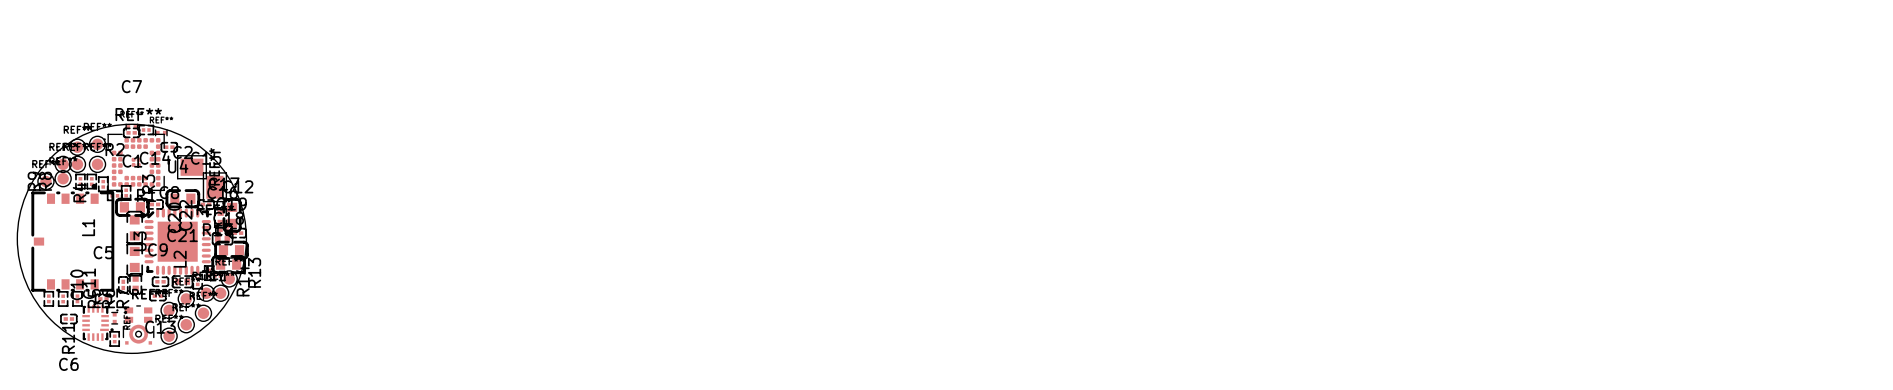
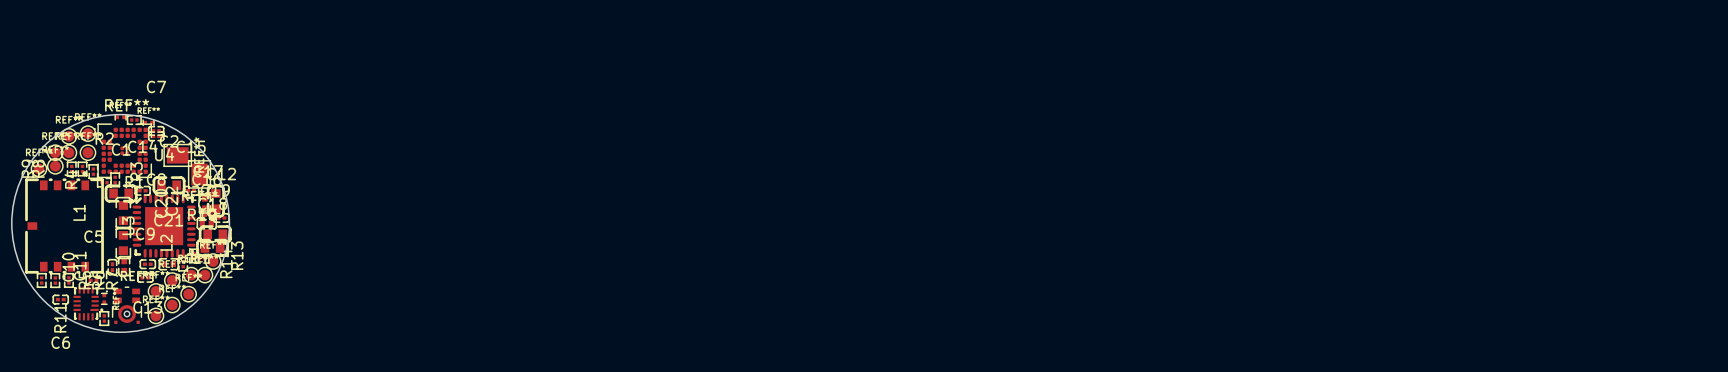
C7 position: (131, 132) -> (156, 130)

